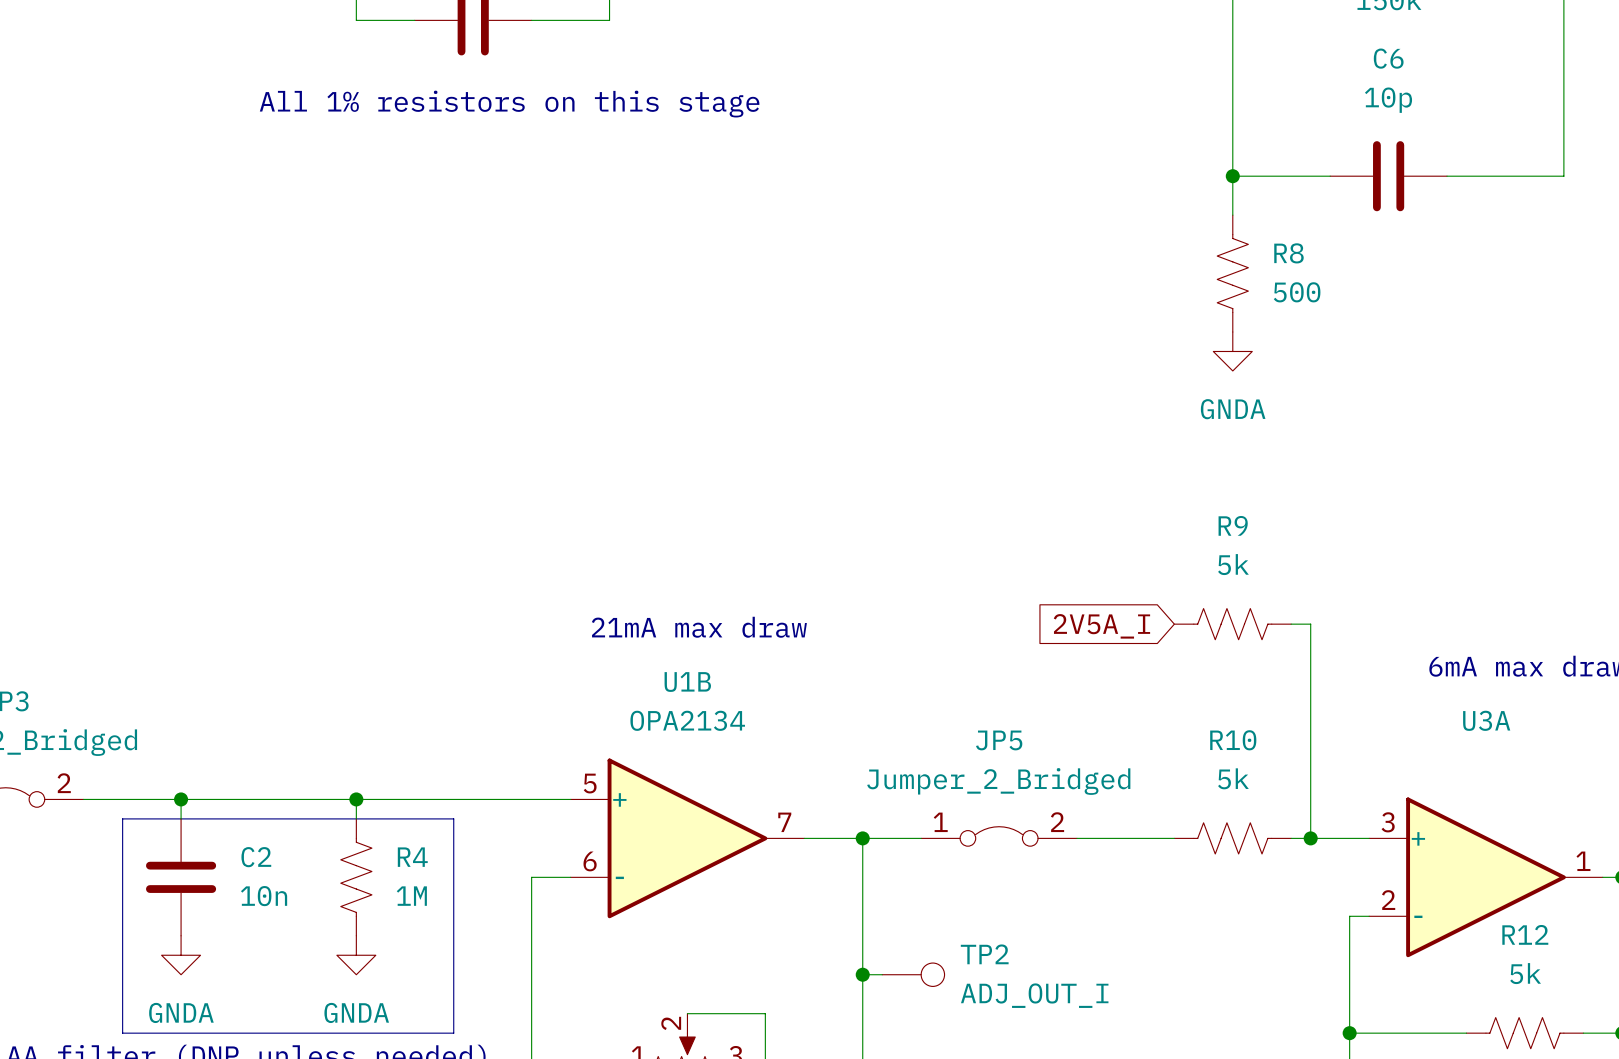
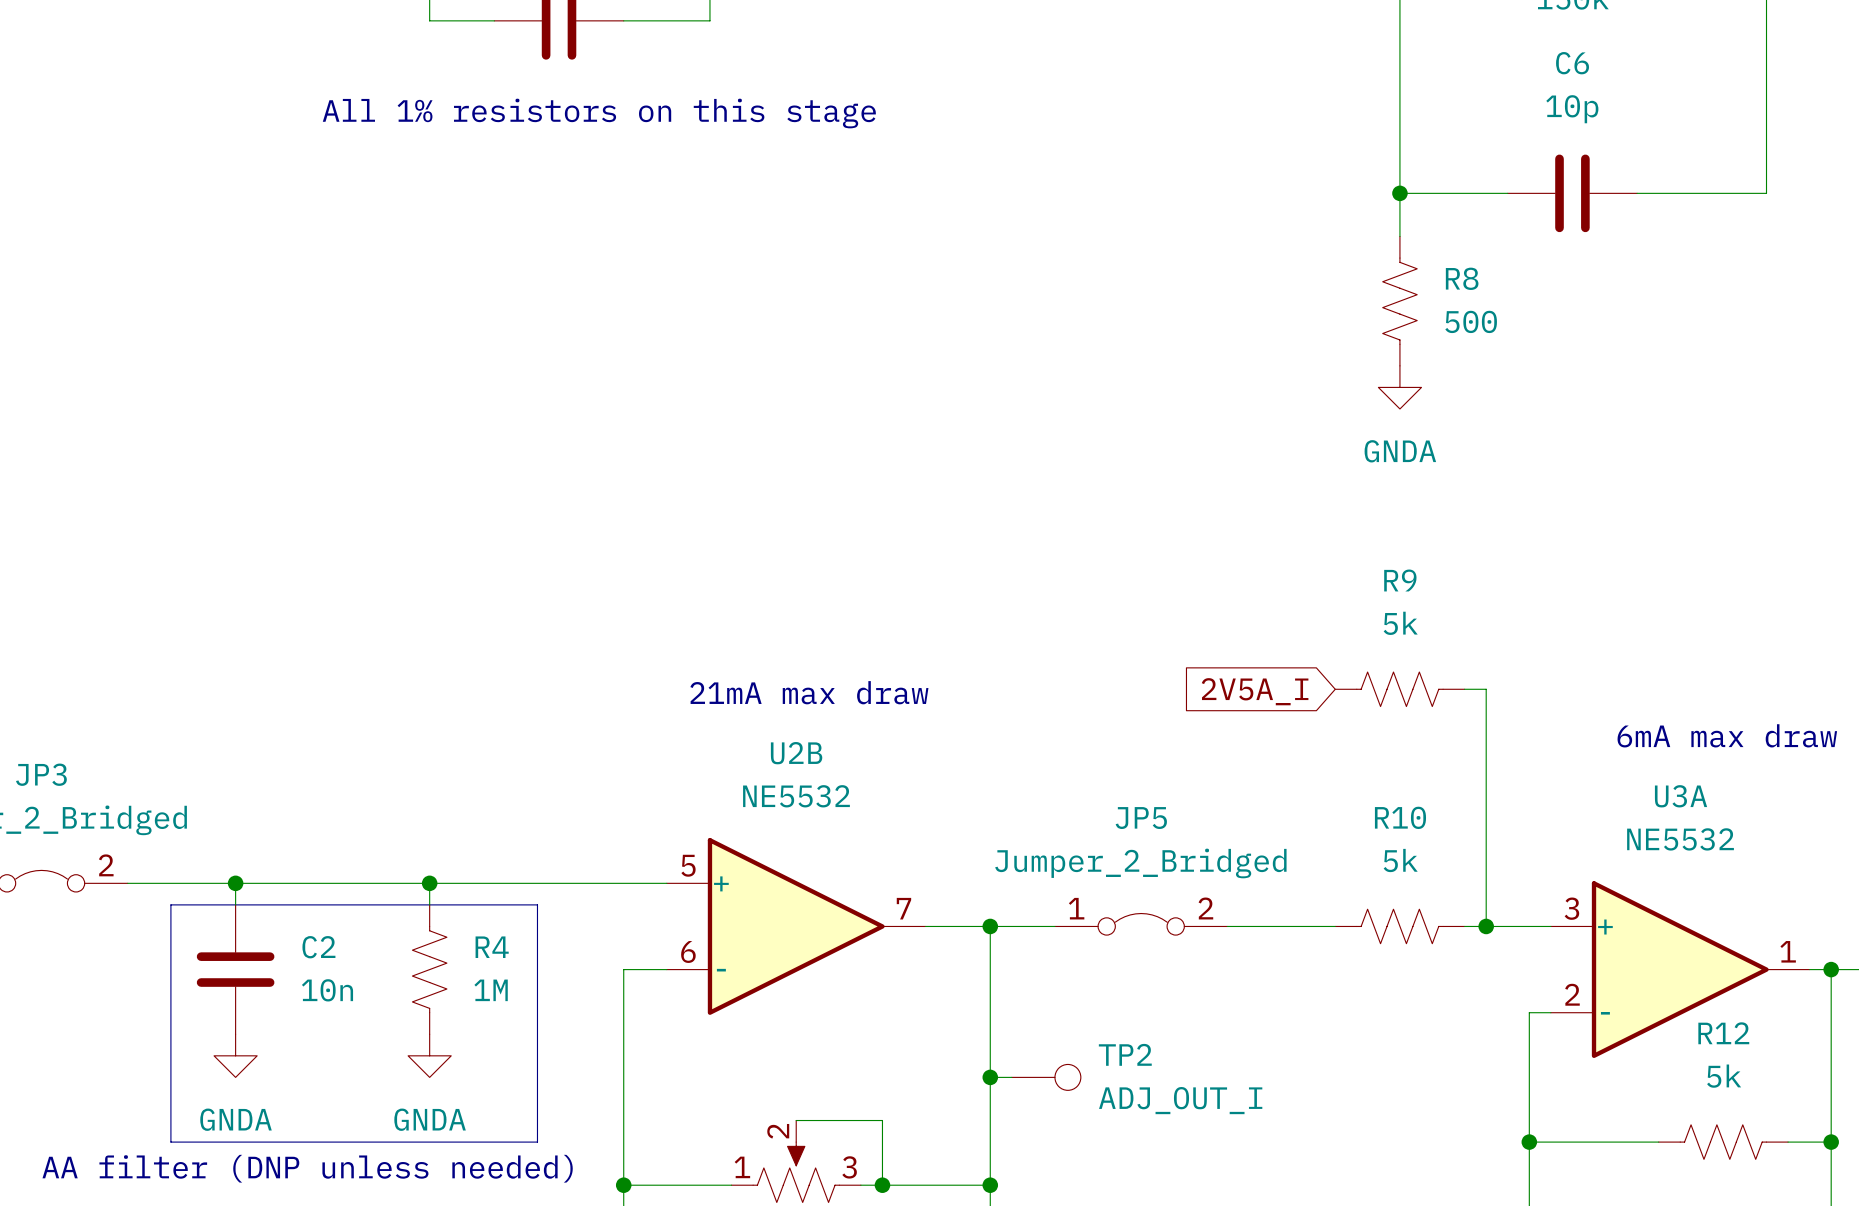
U1B name: U1B (687, 682) -> U2B (796, 753)
U1B value: OPA2134 (687, 720) -> NE5532 (796, 796)
U3A value: none -> NE5532 (1680, 839)

